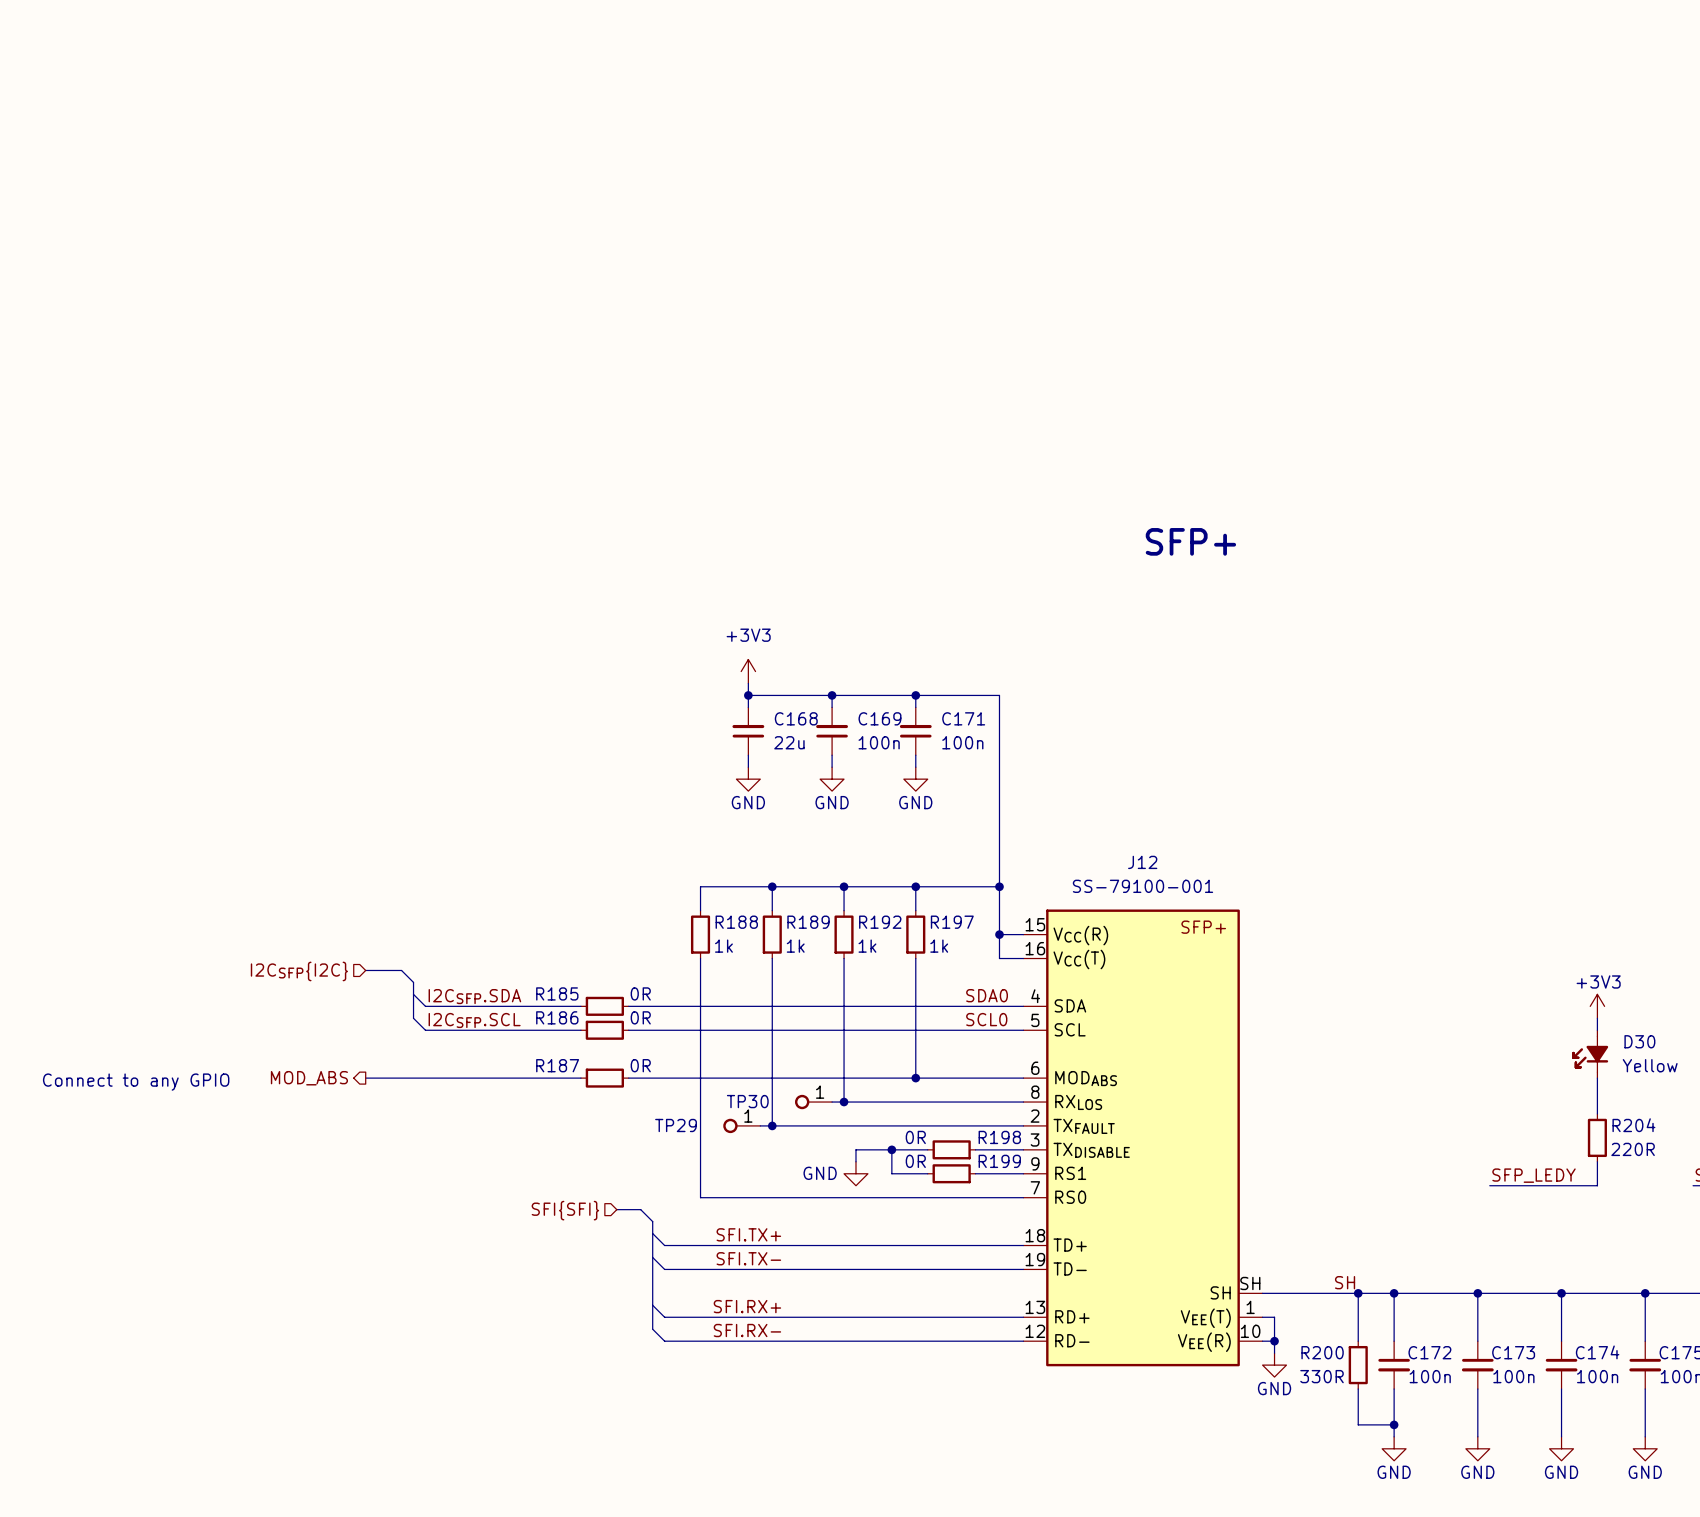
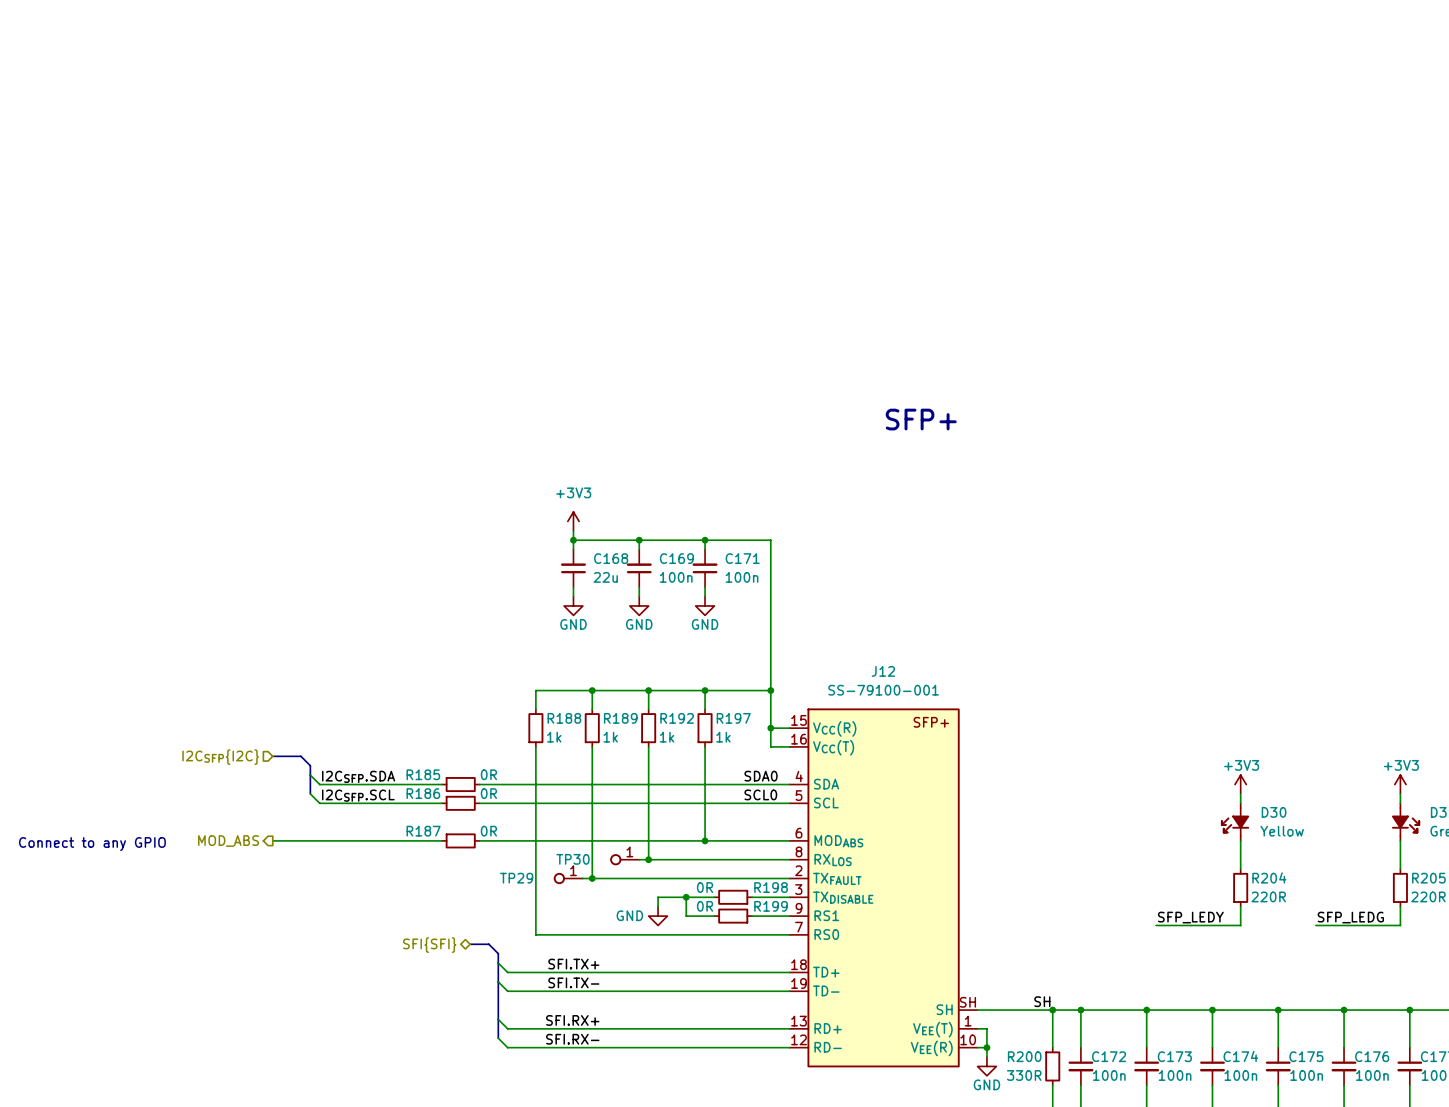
hierarchical label shape: input (565, 1210) -> bidirectional (429, 945)

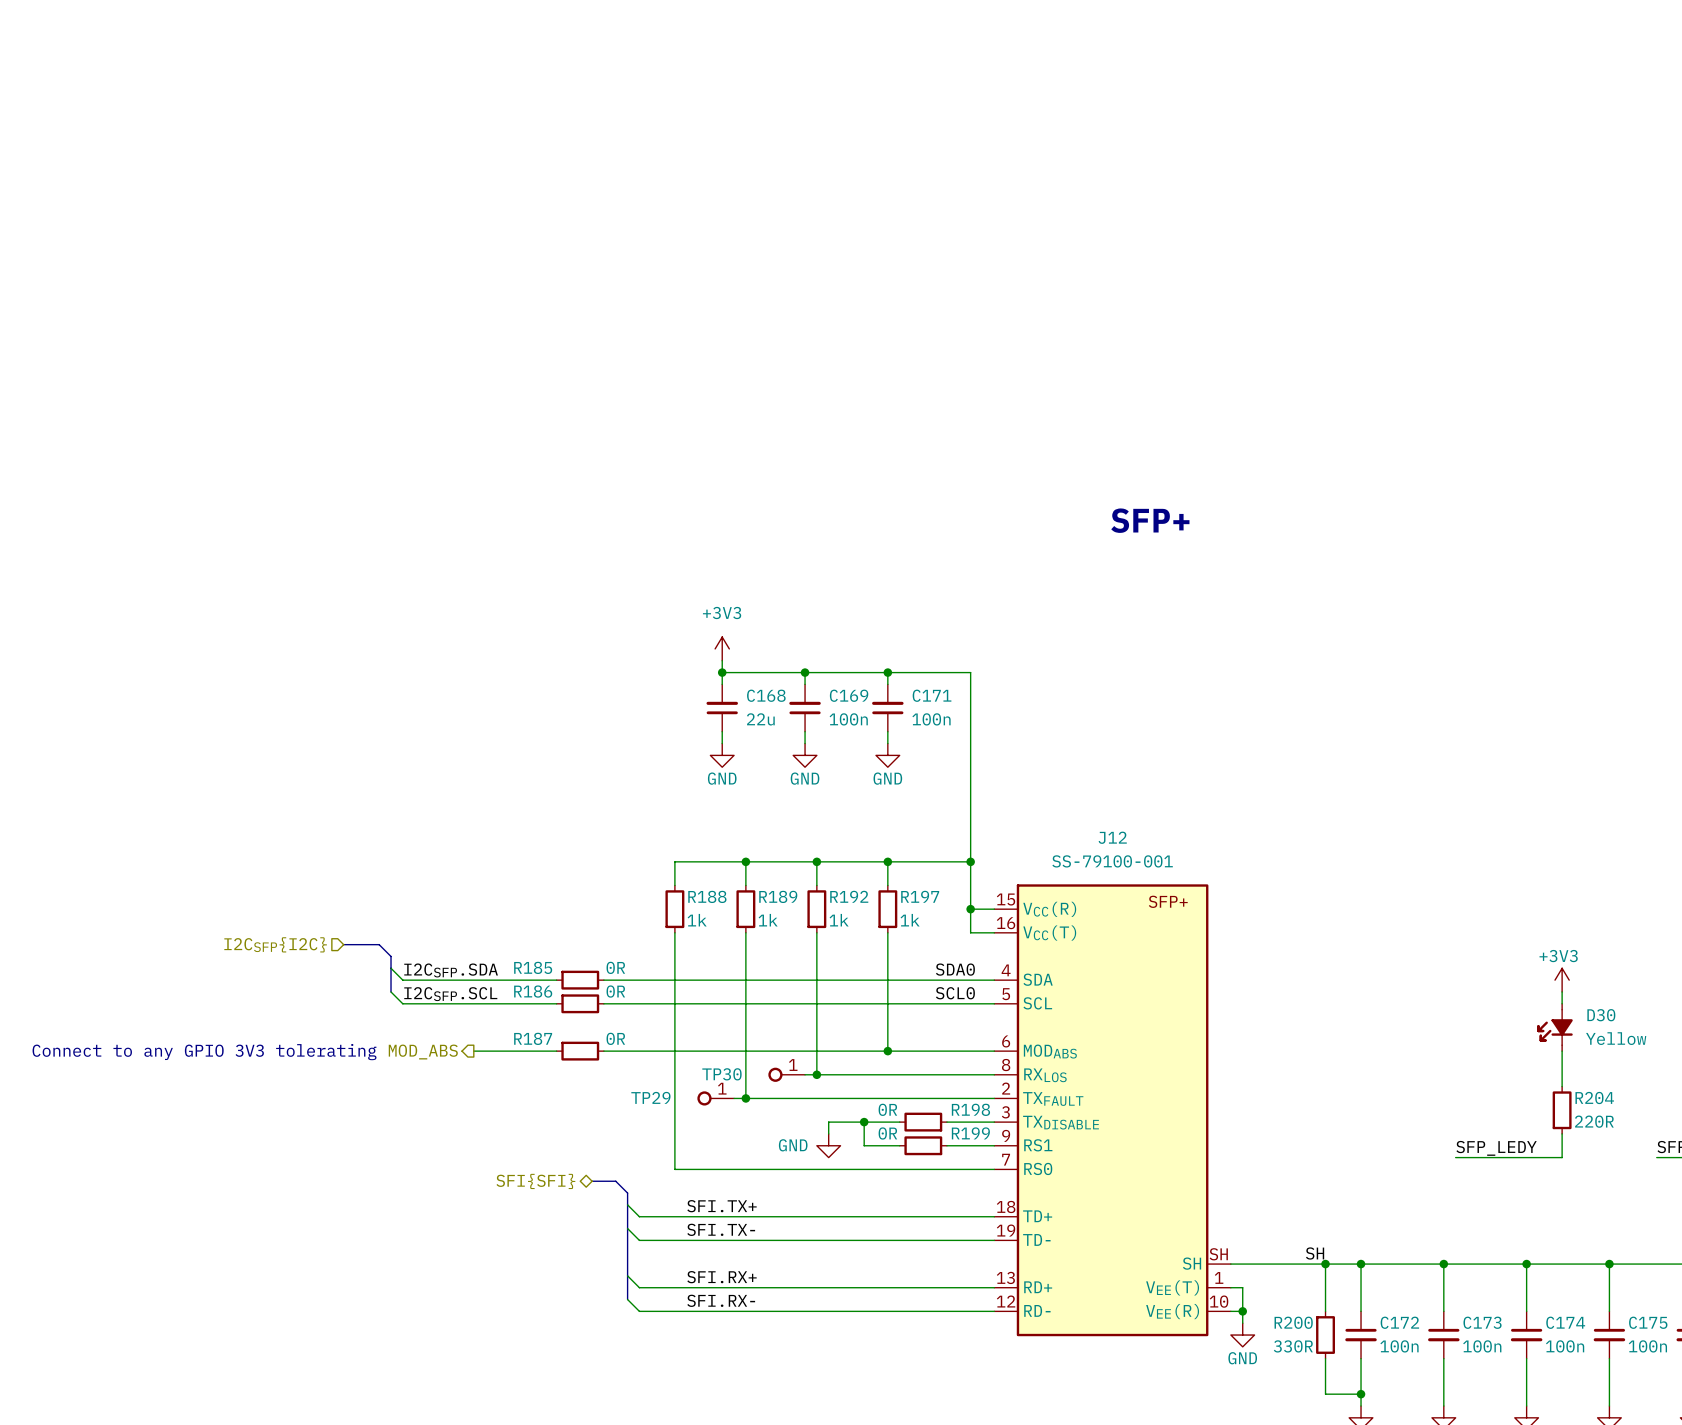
wire: (272, 840) (376, 840) -> none
hierarchical label position: MOD_ABS (228, 841) -> MOD_ABS (423, 1052)
text: Connect to any GPIO (92, 844) -> Connect to any GPIO 3V3 tolerating (204, 1052)

